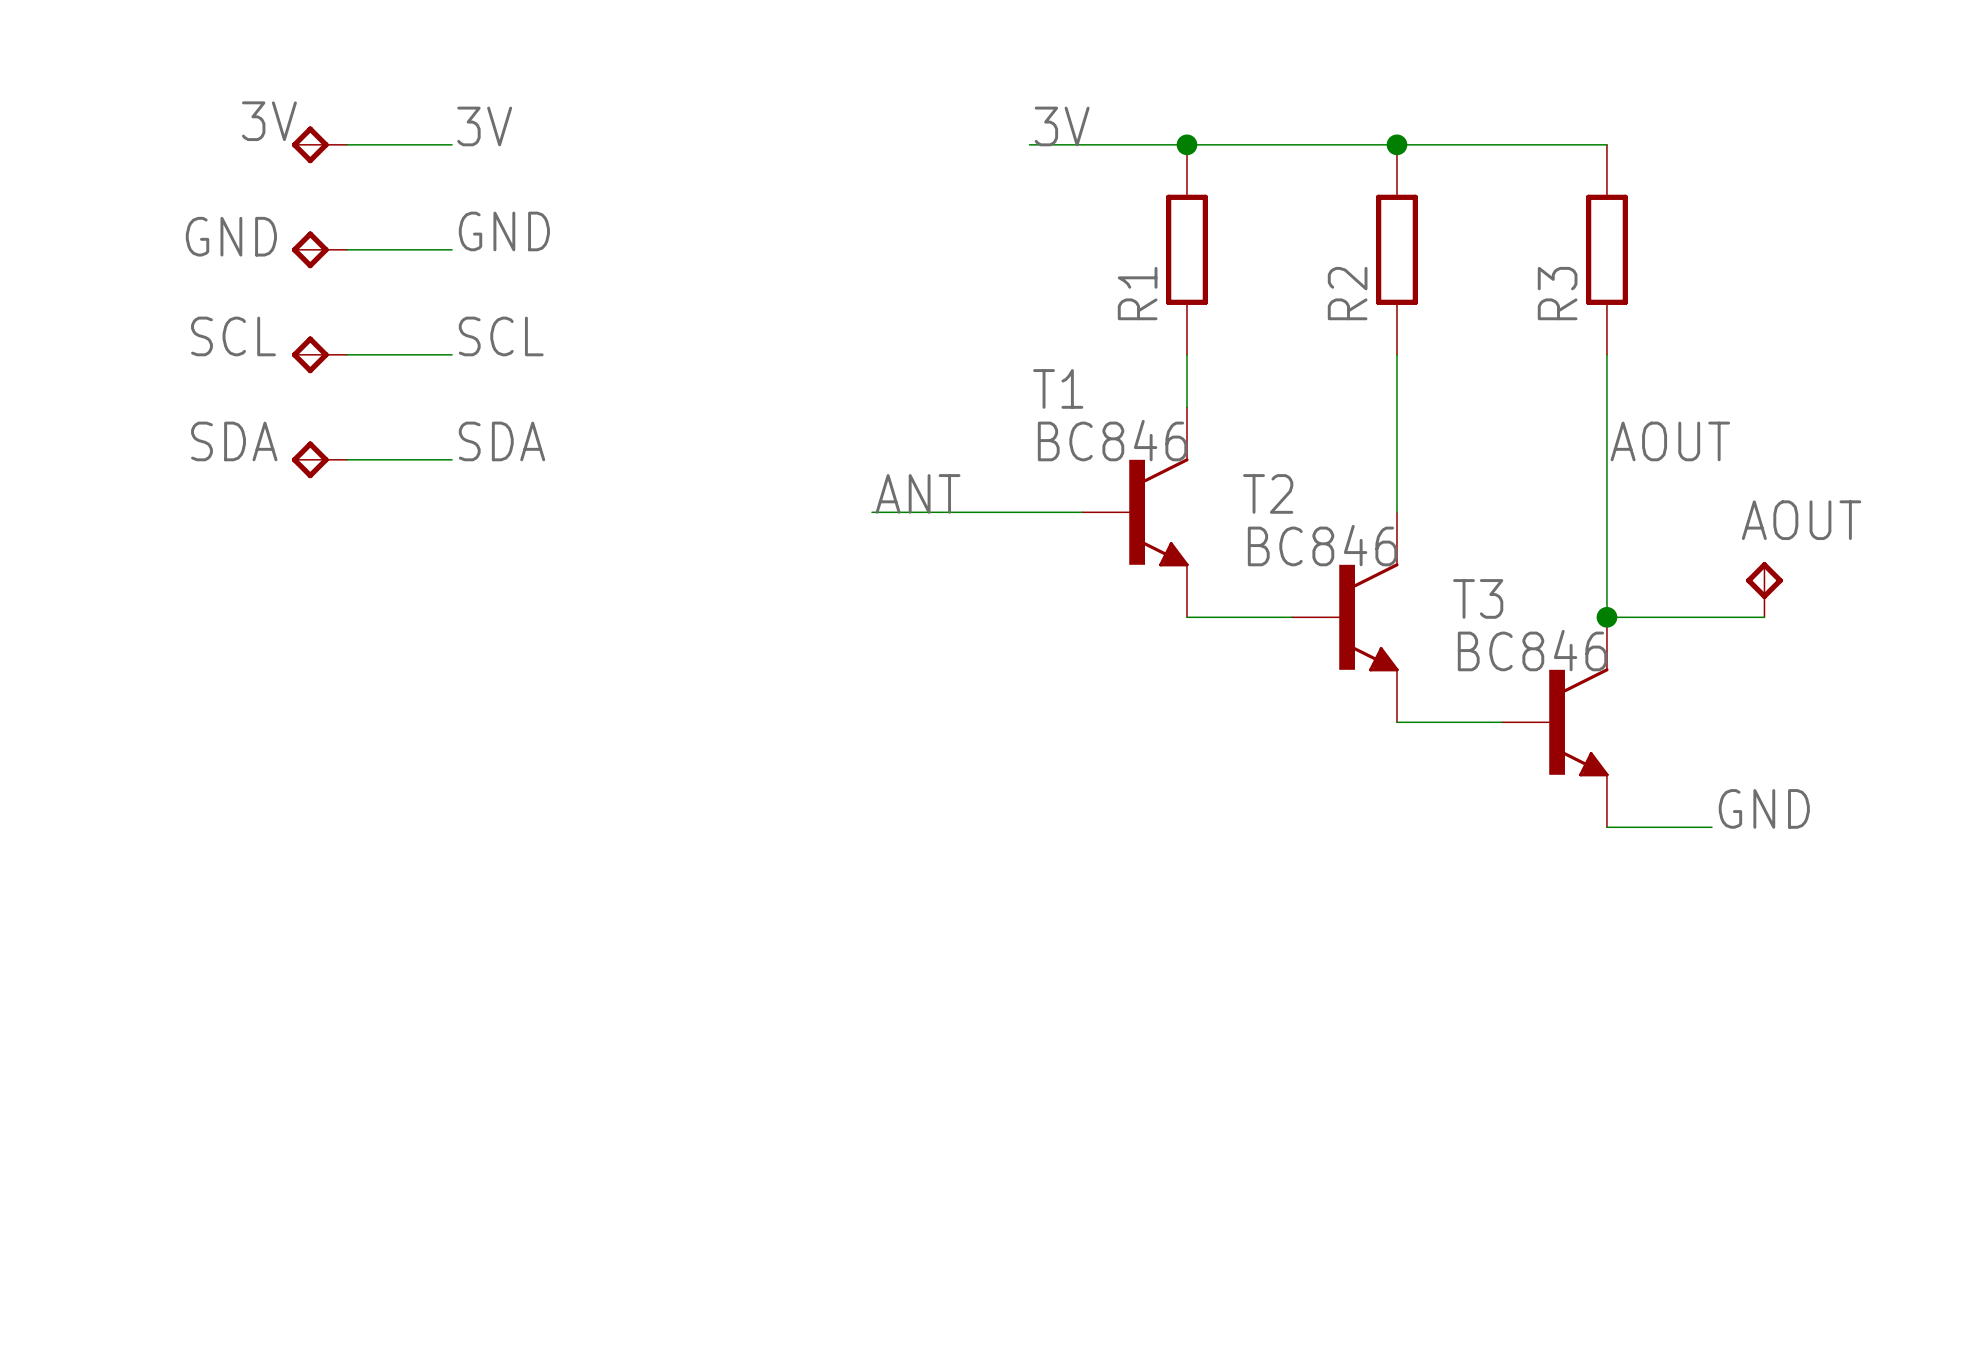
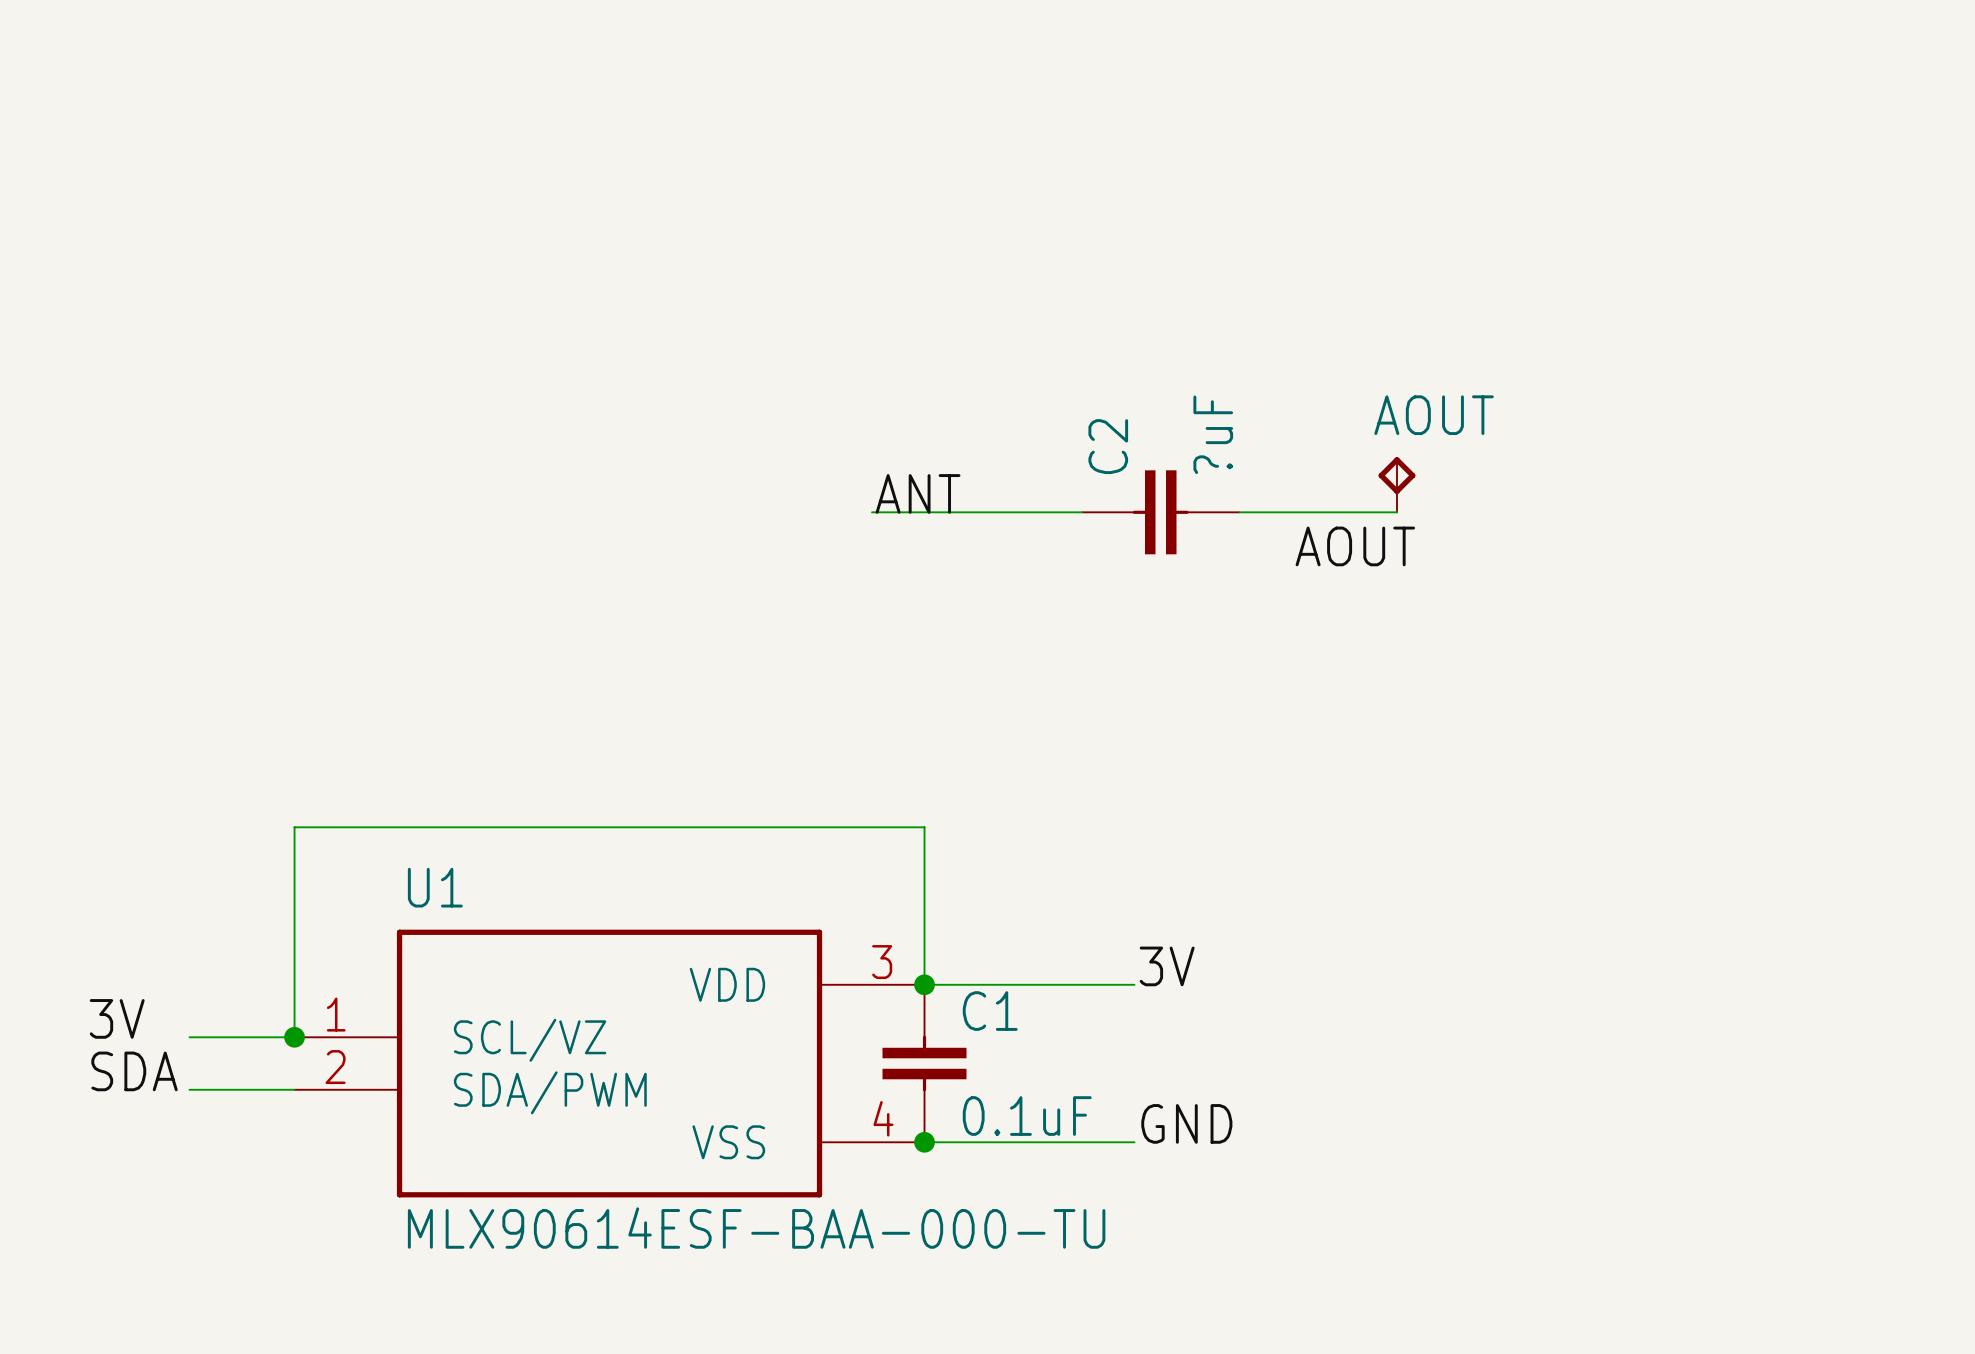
label: 3V (484, 126) -> none
label: 3V (1062, 126) -> none
3V: (319, 144) -> none
wire: (347, 144) (452, 144) -> none
wire: (1029, 144) (1606, 144) -> none
junction: (1186, 144) -> none
junction: (1396, 144) -> none
label: GND (504, 231) -> none
GND: (319, 249) -> none
wire: (347, 249) (452, 249) -> none
R1: (1186, 249) -> none
R2: (1396, 249) -> none
R3: (1606, 249) -> none
label: SCL (501, 336) -> none
SCL: (319, 354) -> none
wire: (347, 354) (452, 354) -> none
wire: (1186, 354) (1186, 407) -> none
wire: (1396, 354) (1396, 512) -> (1239, 512) (1396, 512)
wire: (1606, 354) (1606, 617) (1764, 617) -> none
label: SDA (502, 441) -> none
label position: AOUT (1670, 441) -> AOUT (1355, 546)
SDA: (319, 459) -> none
wire: (347, 459) (452, 459) -> none
T1: BC846 (1135, 512) -> none
C2: none -> ?uF (1160, 512)
AOUT position: (1764, 589) -> (1396, 484)
wire: (1186, 617) (1291, 617) -> none
T2: BC846 (1345, 617) -> none
junction: (1606, 617) -> none
wire: (1396, 722) (1501, 722) -> none
T3: BC846 (1555, 722) -> none
label: GND (1764, 808) -> none
wire: (1606, 827) (1711, 827) -> none
label: none -> 3V (1167, 966)
junction: none -> (924, 984)
wire: none -> (1134, 984) (924, 984) (924, 827) (294, 827) (294, 1037) (189, 1037)
label: none -> 3V (117, 1018)
junction: none -> (294, 1037)
U1: none -> MLX90614ESF-BAA-000-TU (609, 1063)
C1: none -> 0.1uF (924, 1063)
label: none -> SDA (134, 1071)
wire: none -> (189, 1089) (294, 1089)
label: none -> GND (1186, 1123)
wire: none -> (924, 1142) (1134, 1142)
junction: none -> (924, 1142)

